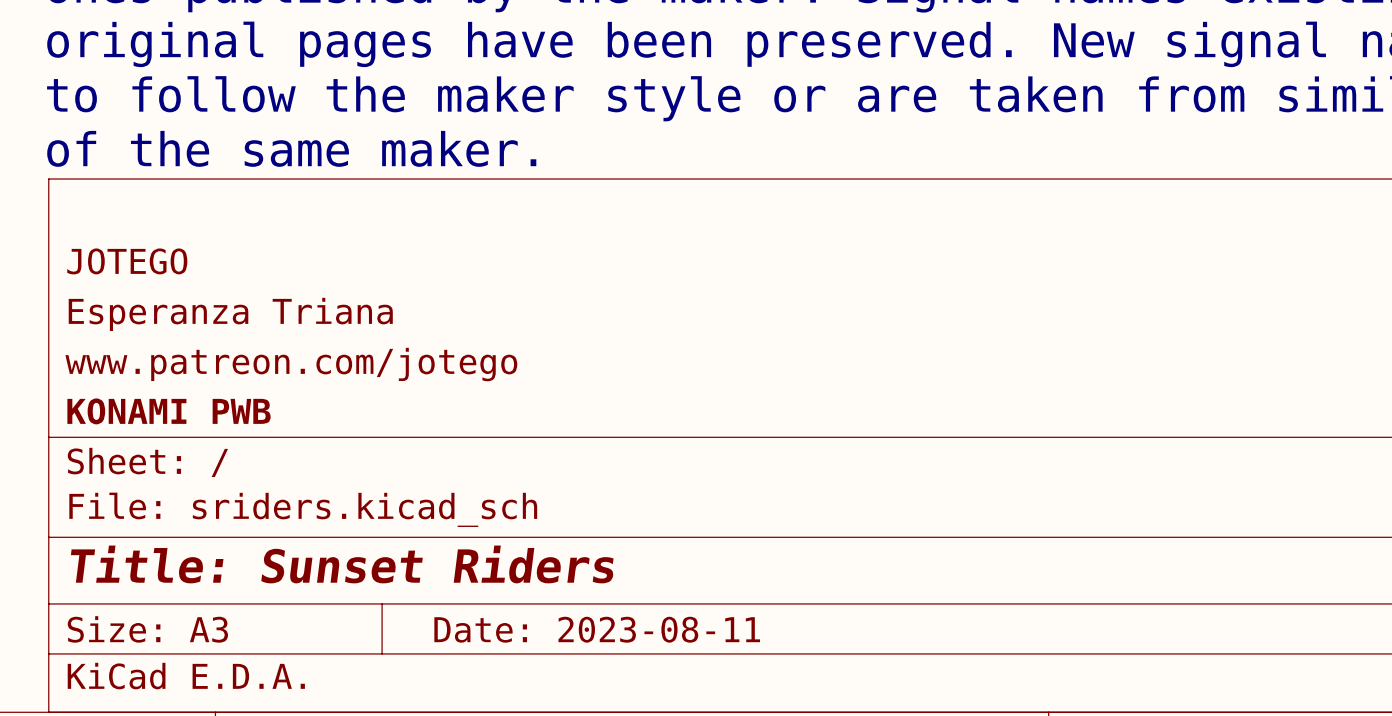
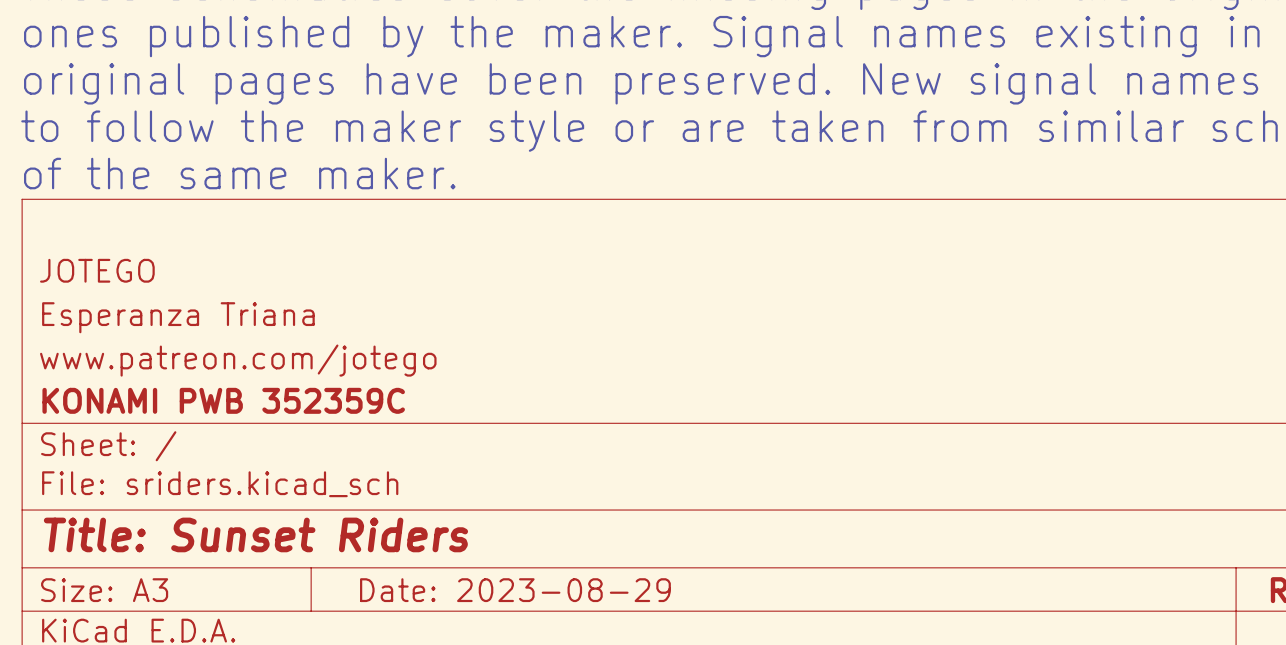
title block: KONAMI PWB (169, 411) -> KONAMI PWB 352359C (223, 400)
title block: Date: 2023-08-11 (597, 629) -> Date: 2023-08-29 (515, 590)

